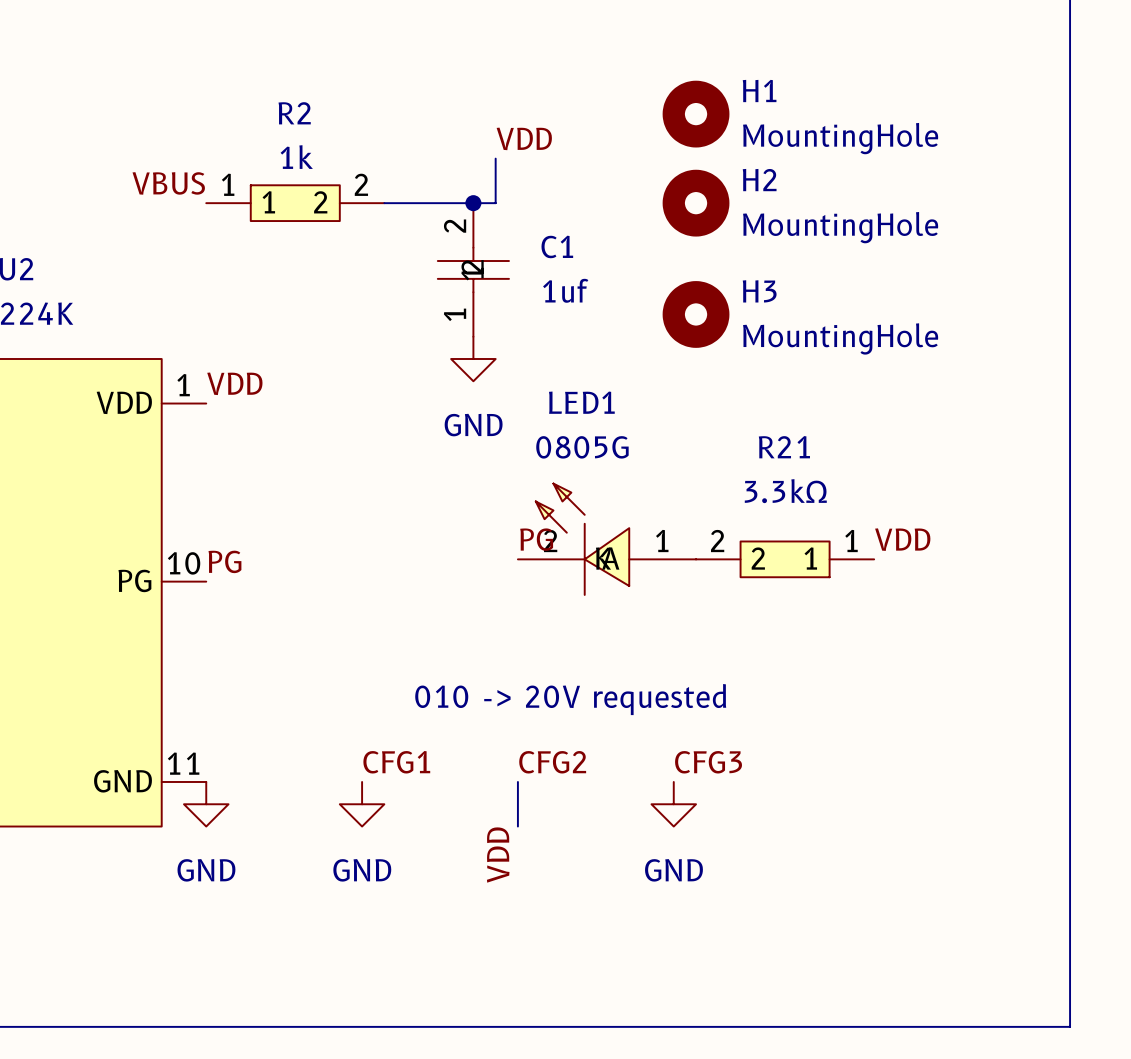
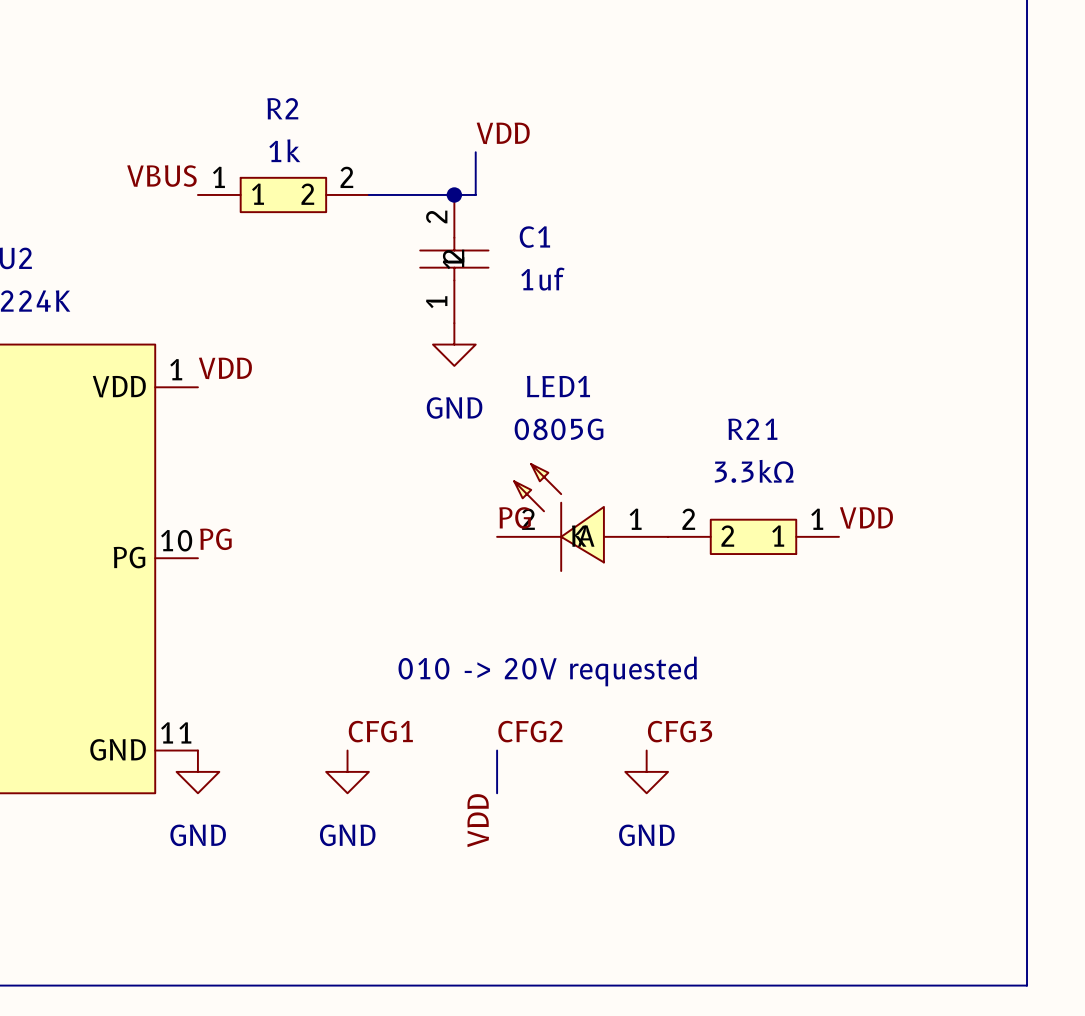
H1: MountingHole (696, 114) -> none
H2: MountingHole (696, 203) -> none
H3: MountingHole (696, 314) -> none

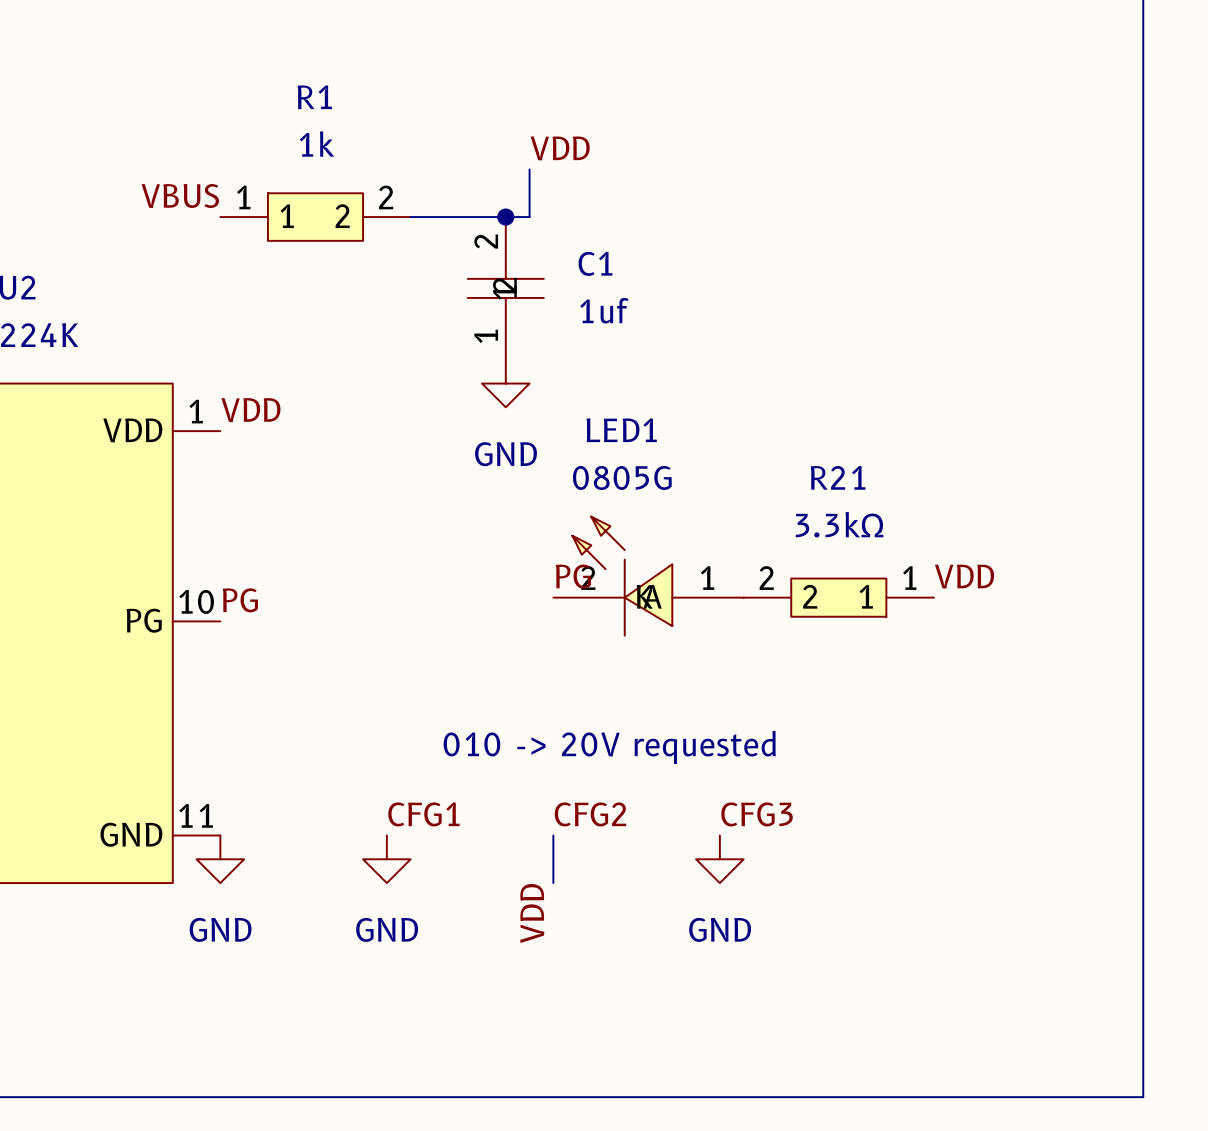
R2: 1k (283, 194) -> none
R1: none -> 1k (315, 217)

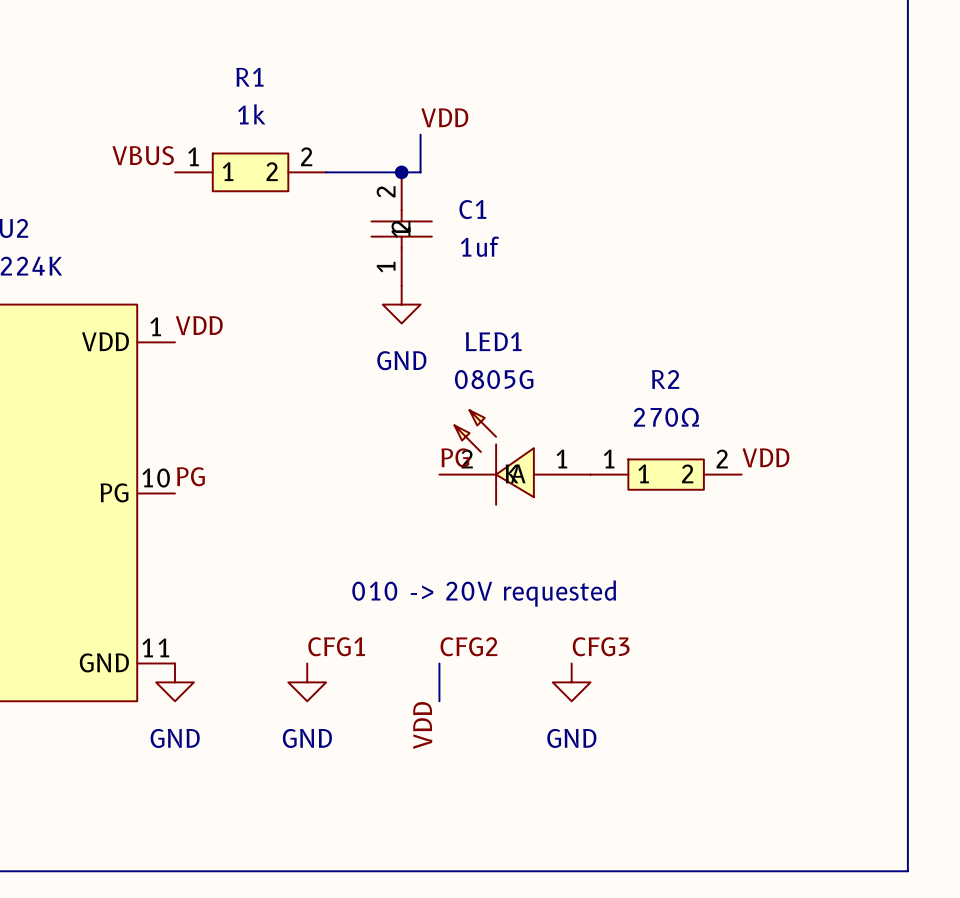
R21 name: R21 (838, 477) -> R2 (665, 379)
R21 value: 3.3kΩ (839, 524) -> 270Ω (666, 417)
R21 rotation: 0° (838, 597) -> 180° (666, 474)

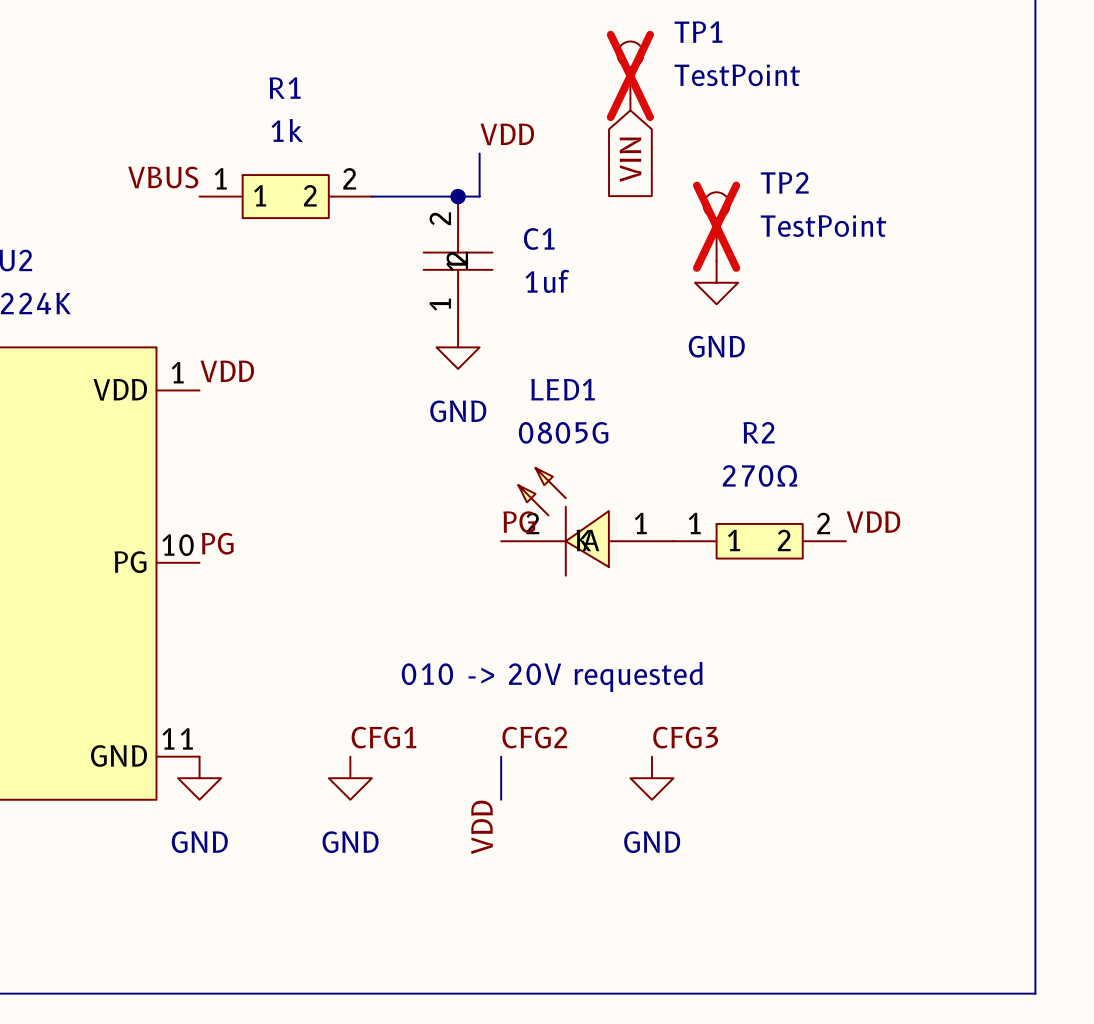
TP1: none -> TestPoint (630, 75)
global label: none -> VIN (630, 159)
TP2: none -> TestPoint (716, 226)
power symbol: none -> GND (716, 282)

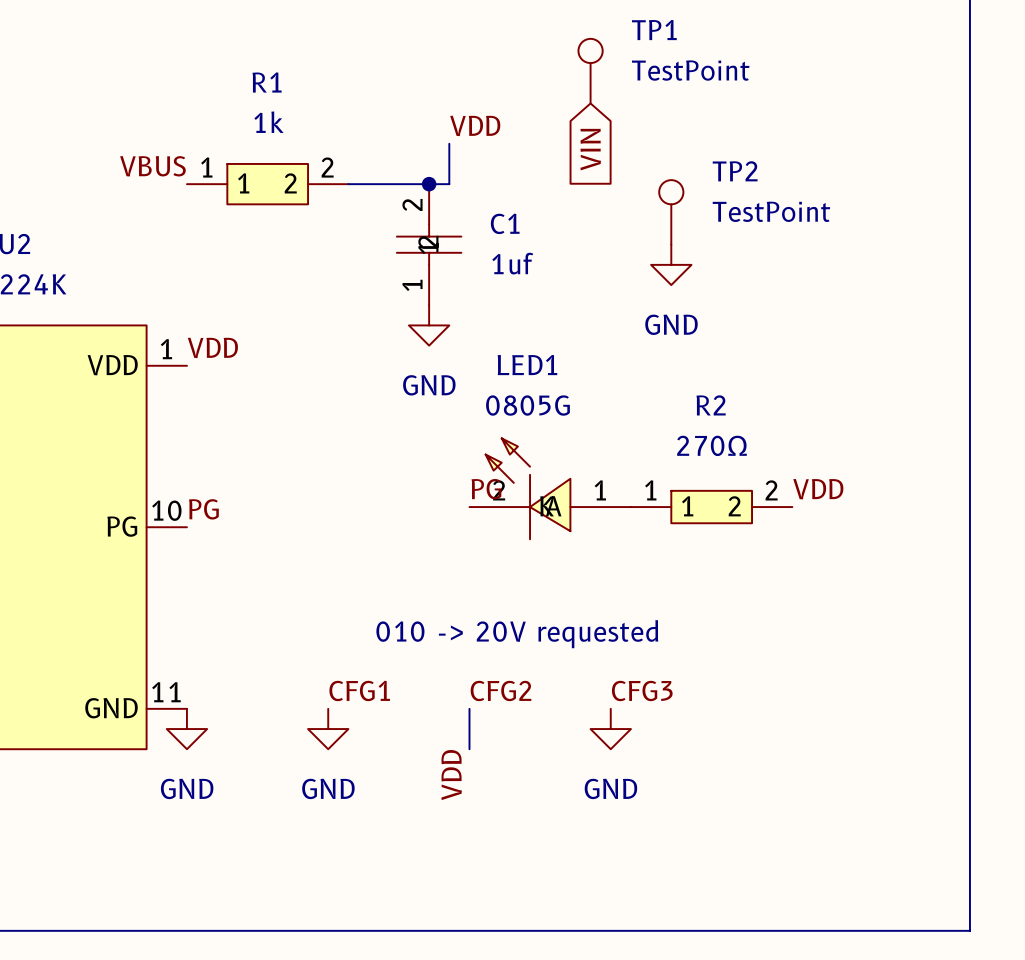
TP1 do-not-place cross: (630, 75) -> none
TP2 do-not-place cross: (716, 226) -> none

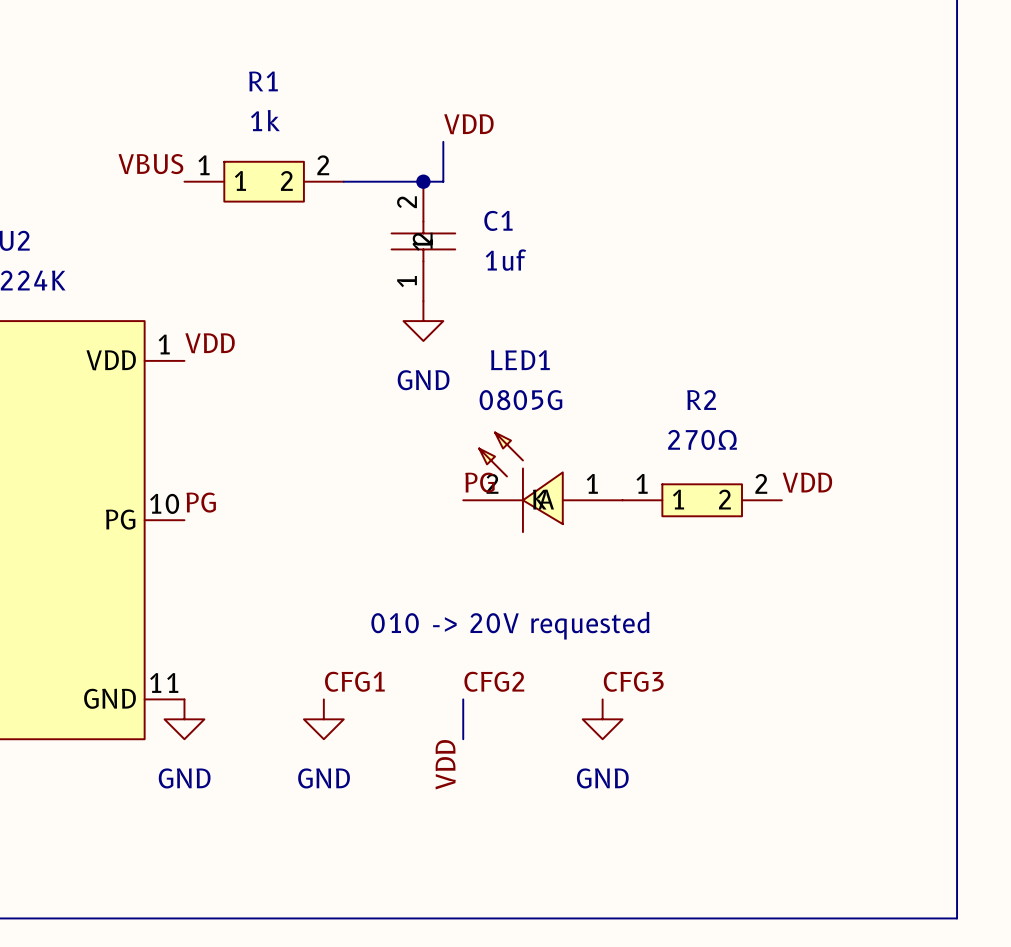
TP1: TestPoint (590, 71) -> none
global label: VIN (590, 149) -> none
TP2: TestPoint (671, 212) -> none
power symbol: GND (671, 264) -> none

